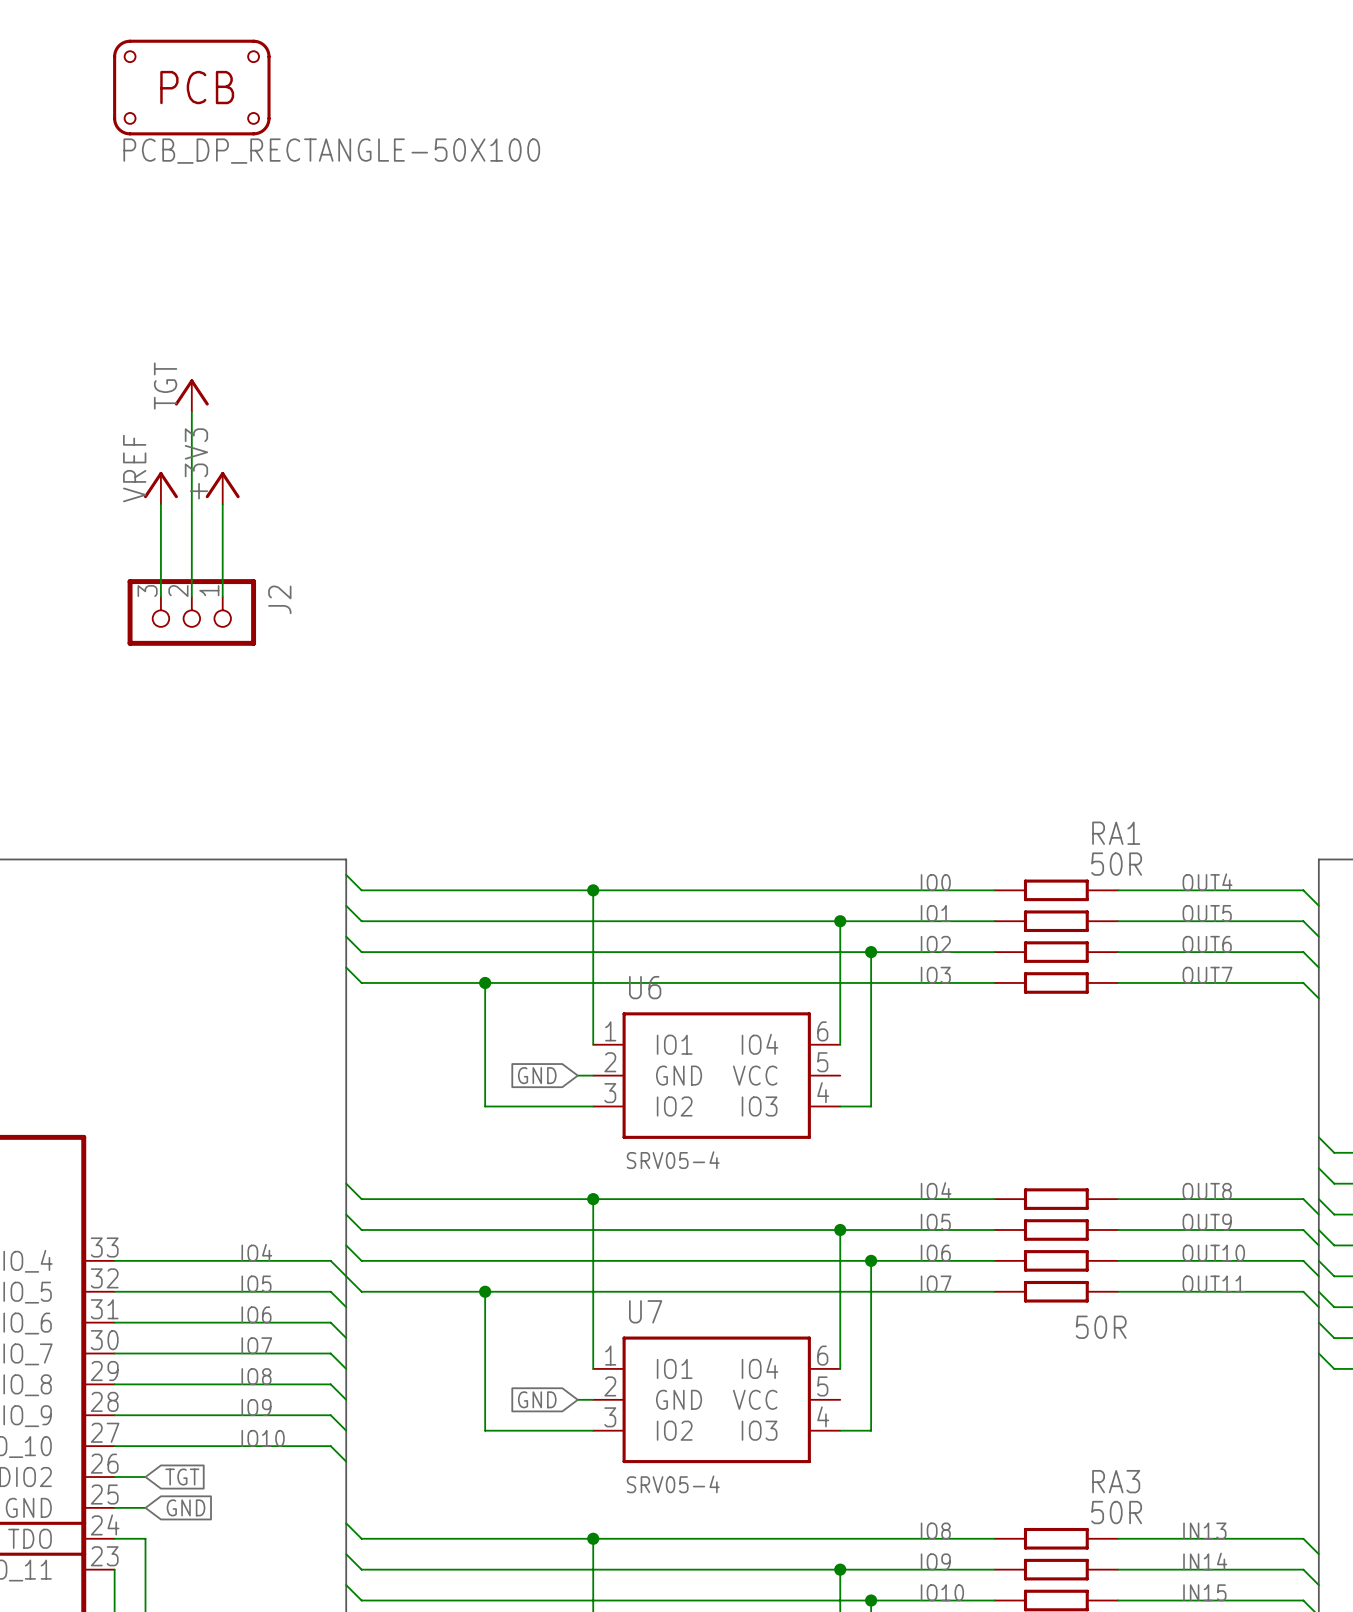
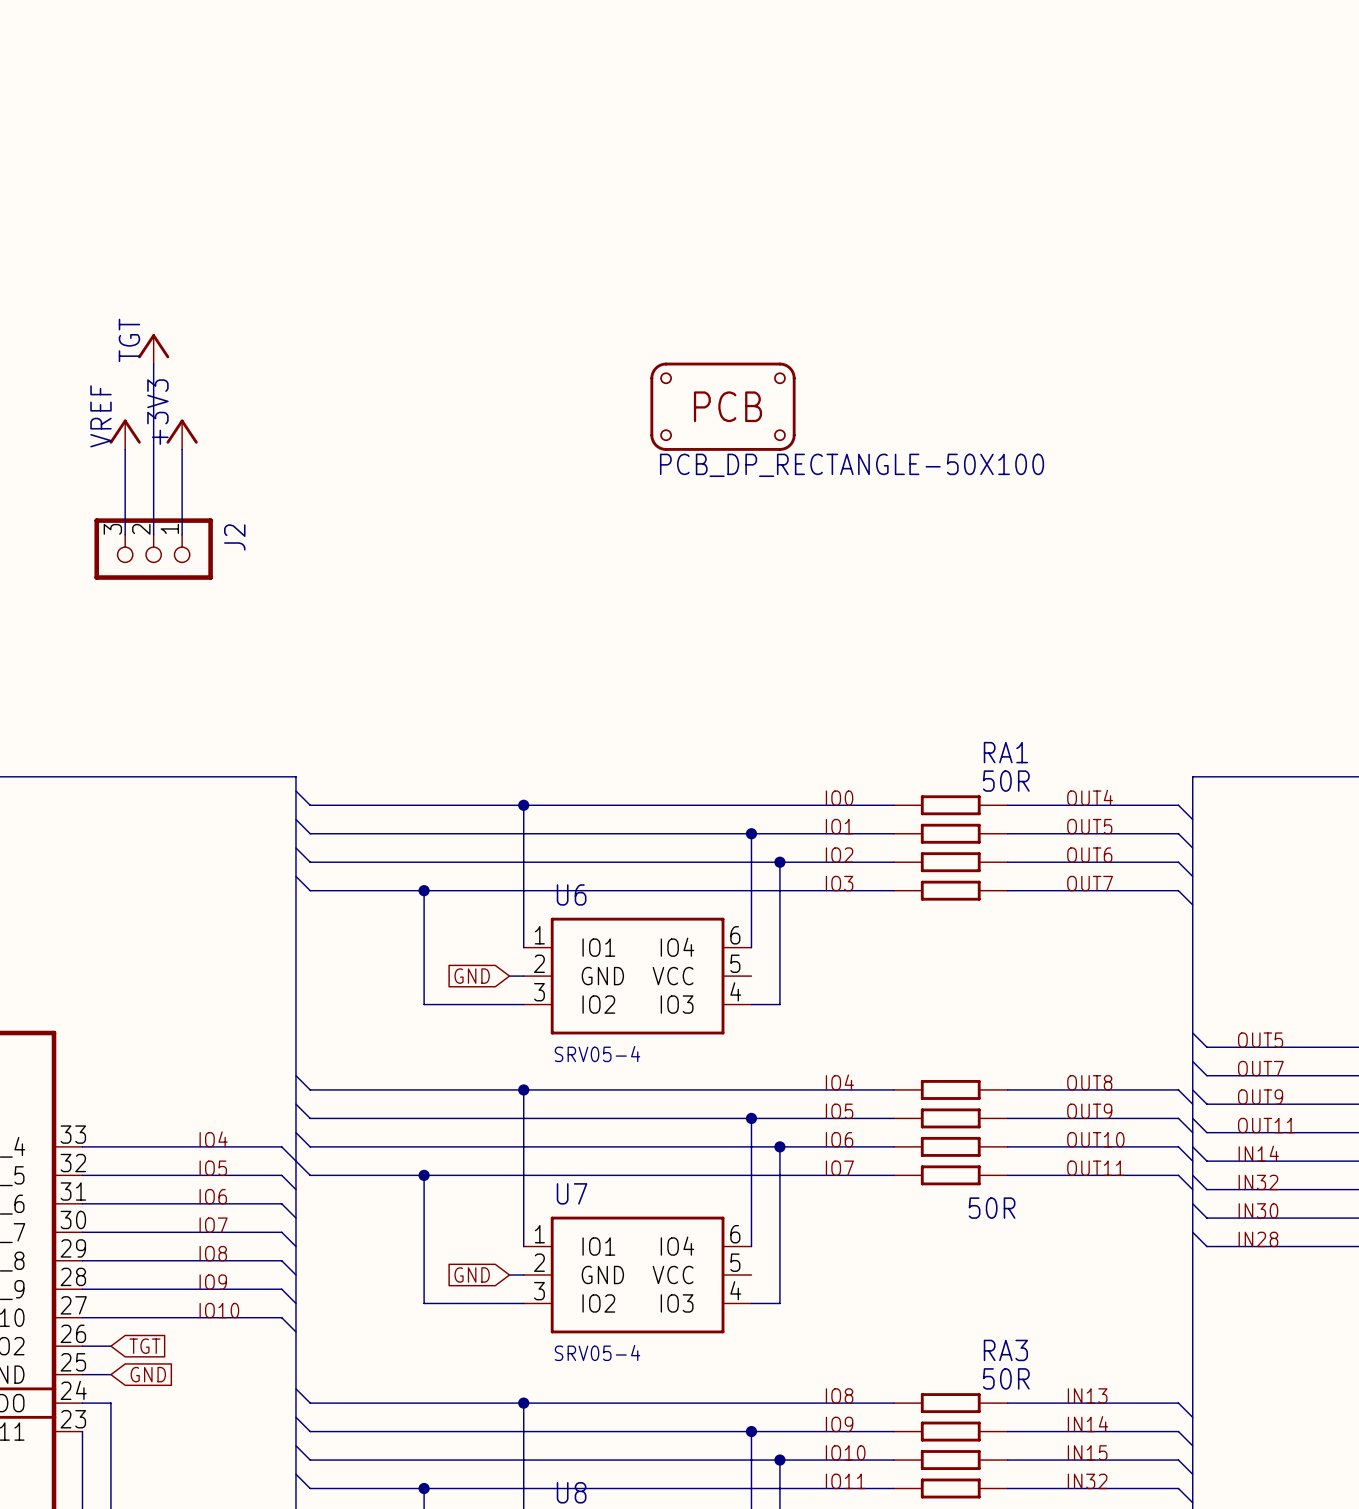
part: PCB_DP_RECTANGLE-50X100 (191, 87) -> none
part: none -> PCB_DP_RECTANGLE-50X100 (723, 406)

